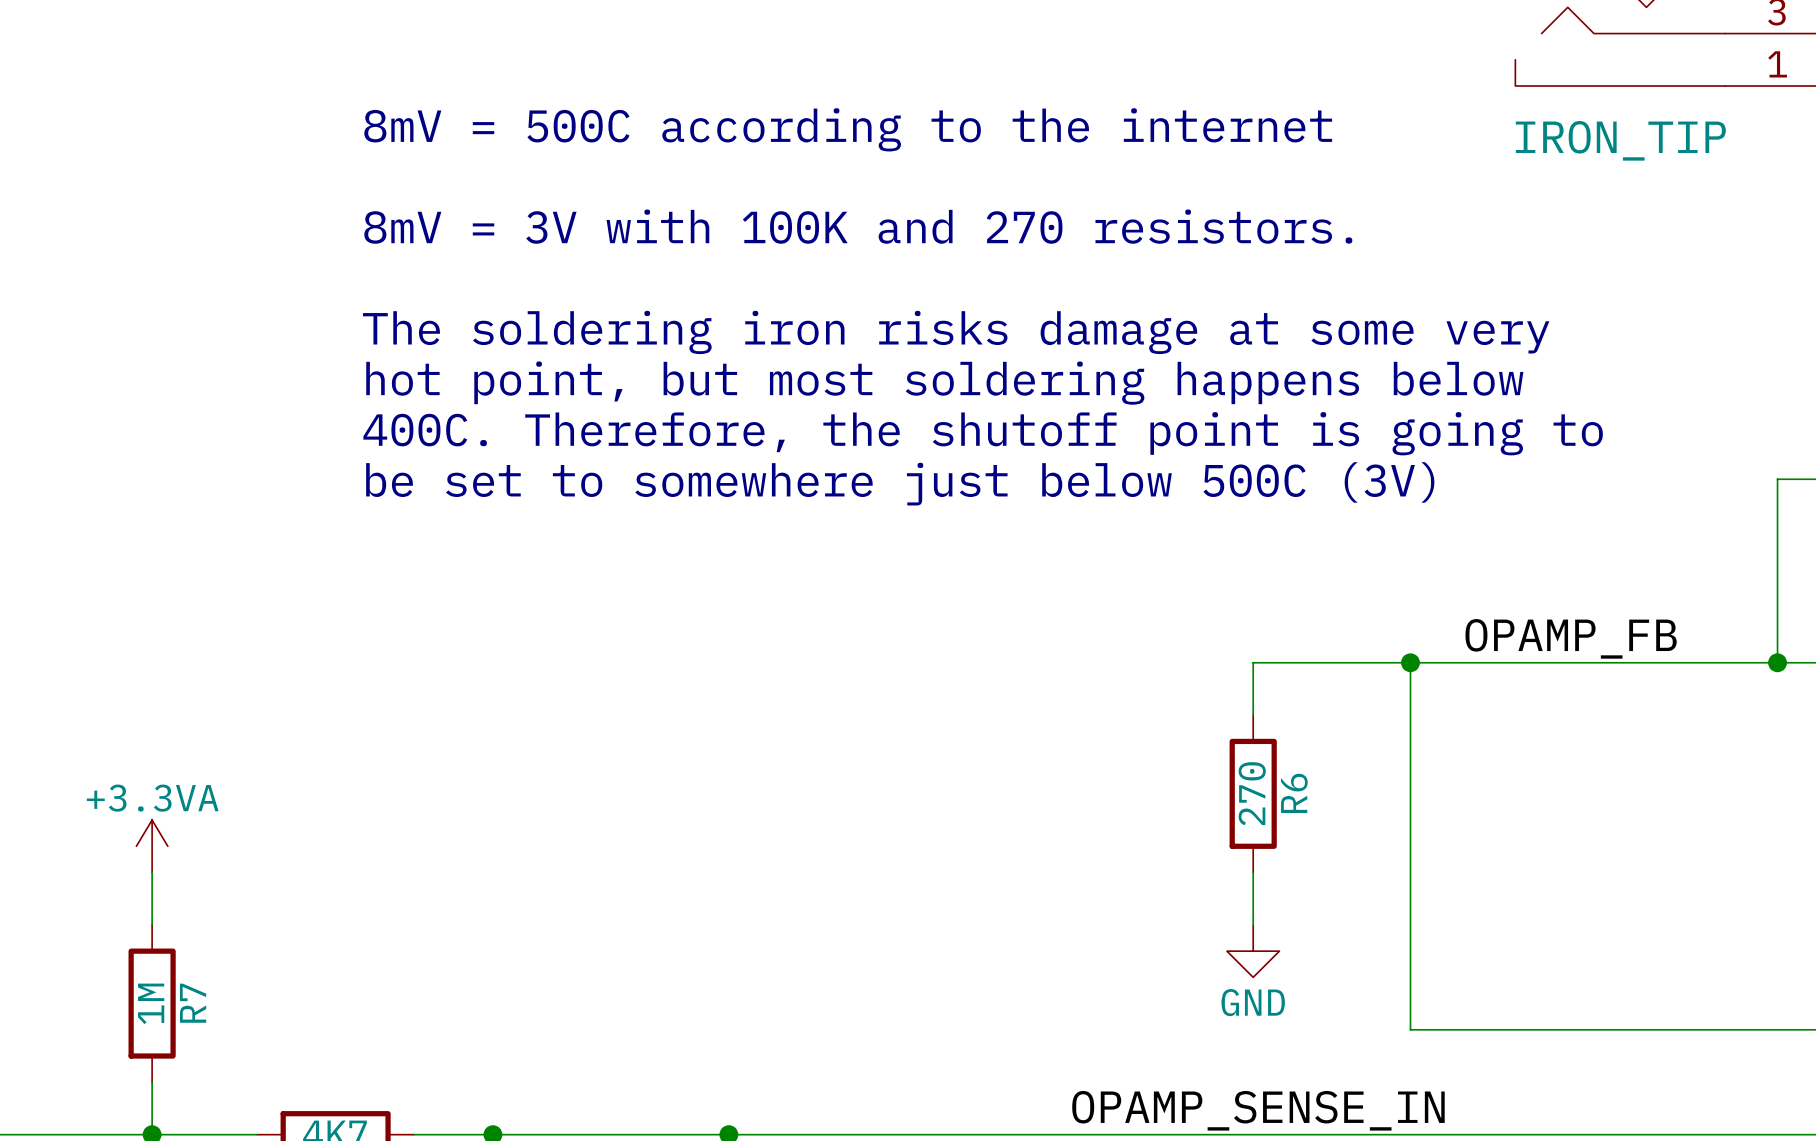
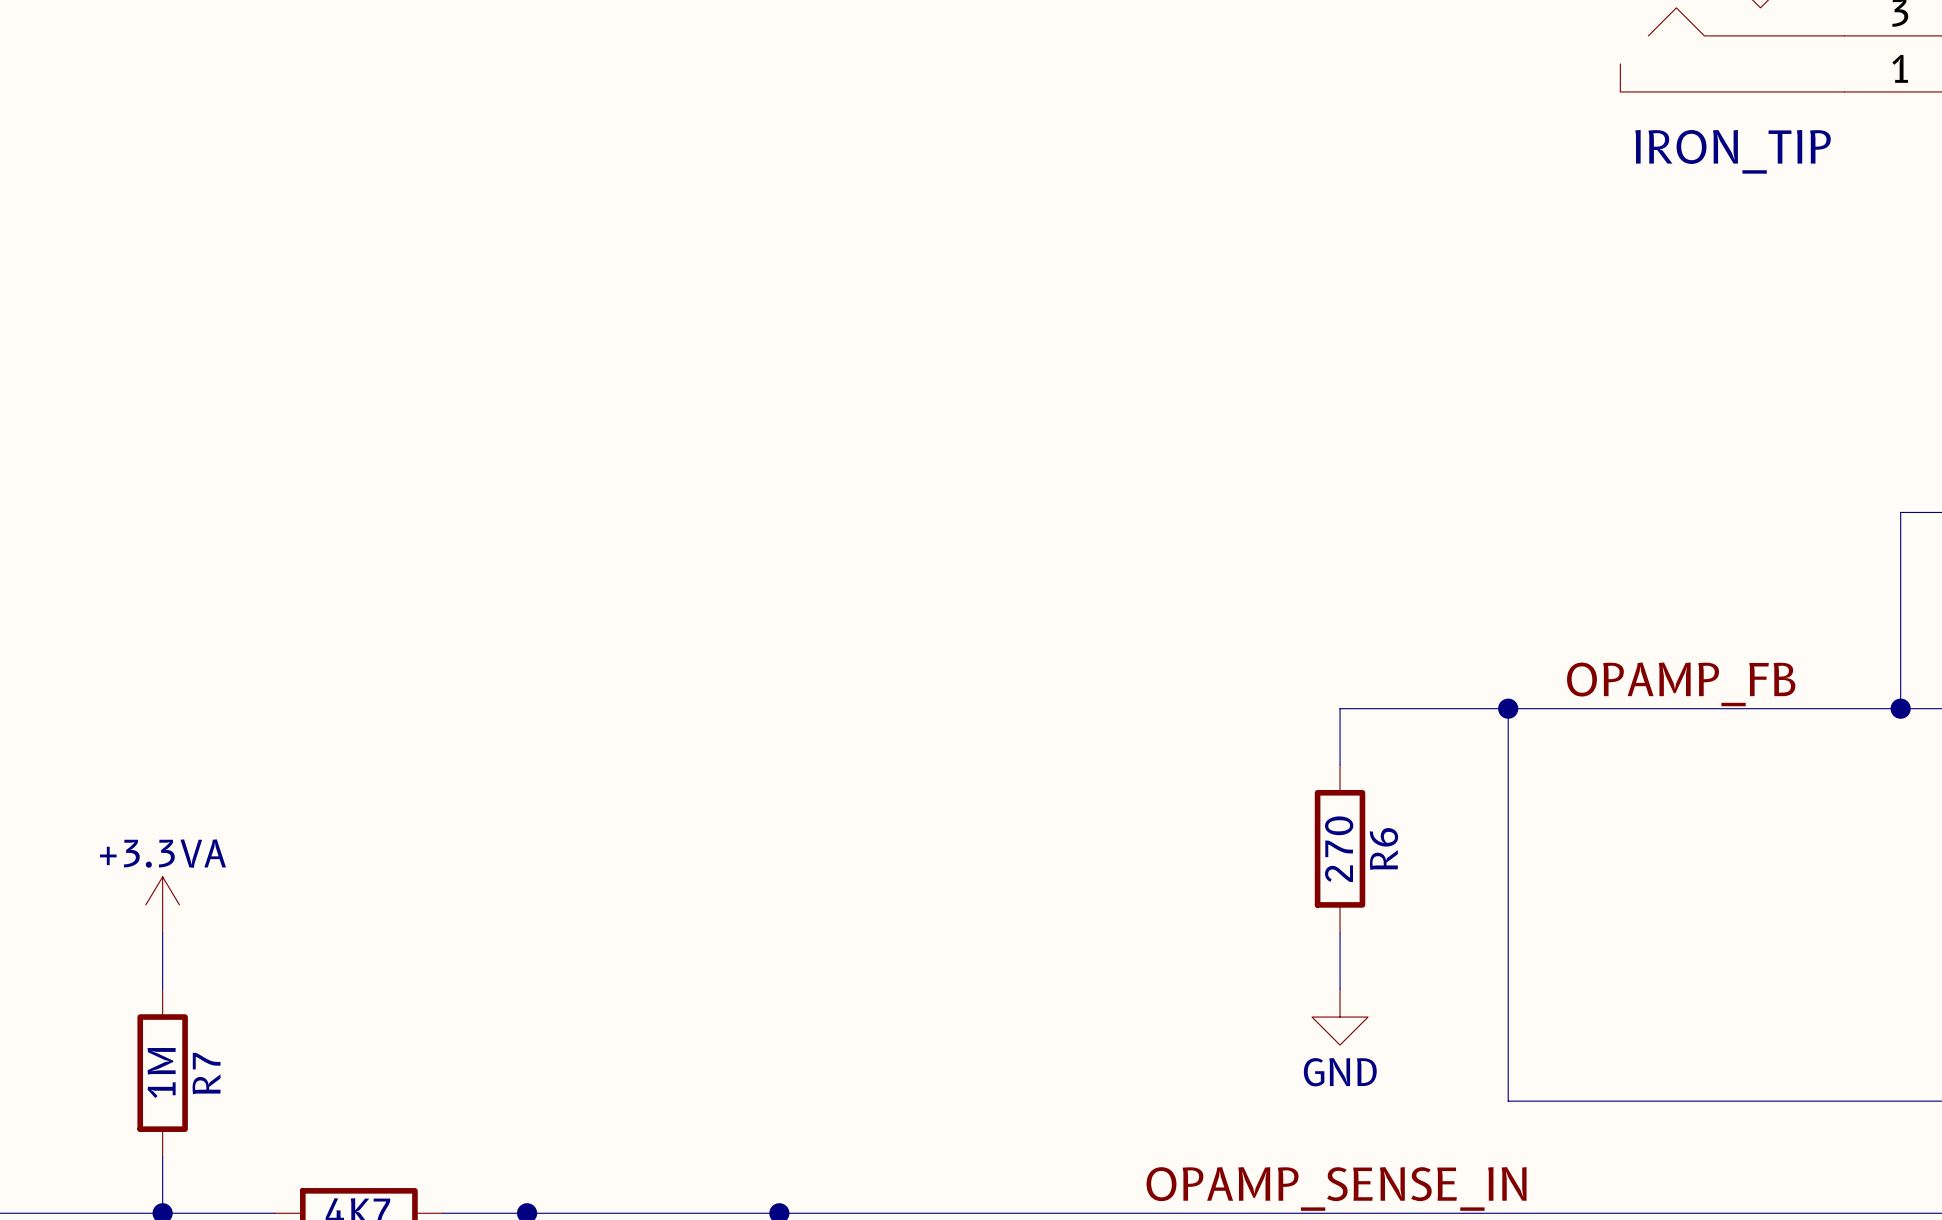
text: 8mV = 500C according to the internet (848, 129) -> none
text: 8mV = 3V with 100K and 270 resistors. (858, 226) -> none
text: The soldering iron risks damage at some very (956, 332) -> none
text: hot point, but most soldering happens below (944, 383) -> none
text: 400C. Therefore, the shutoff point is going to (983, 433) -> none
text: be set to somewhere just below 500C (3V) (900, 483) -> none

